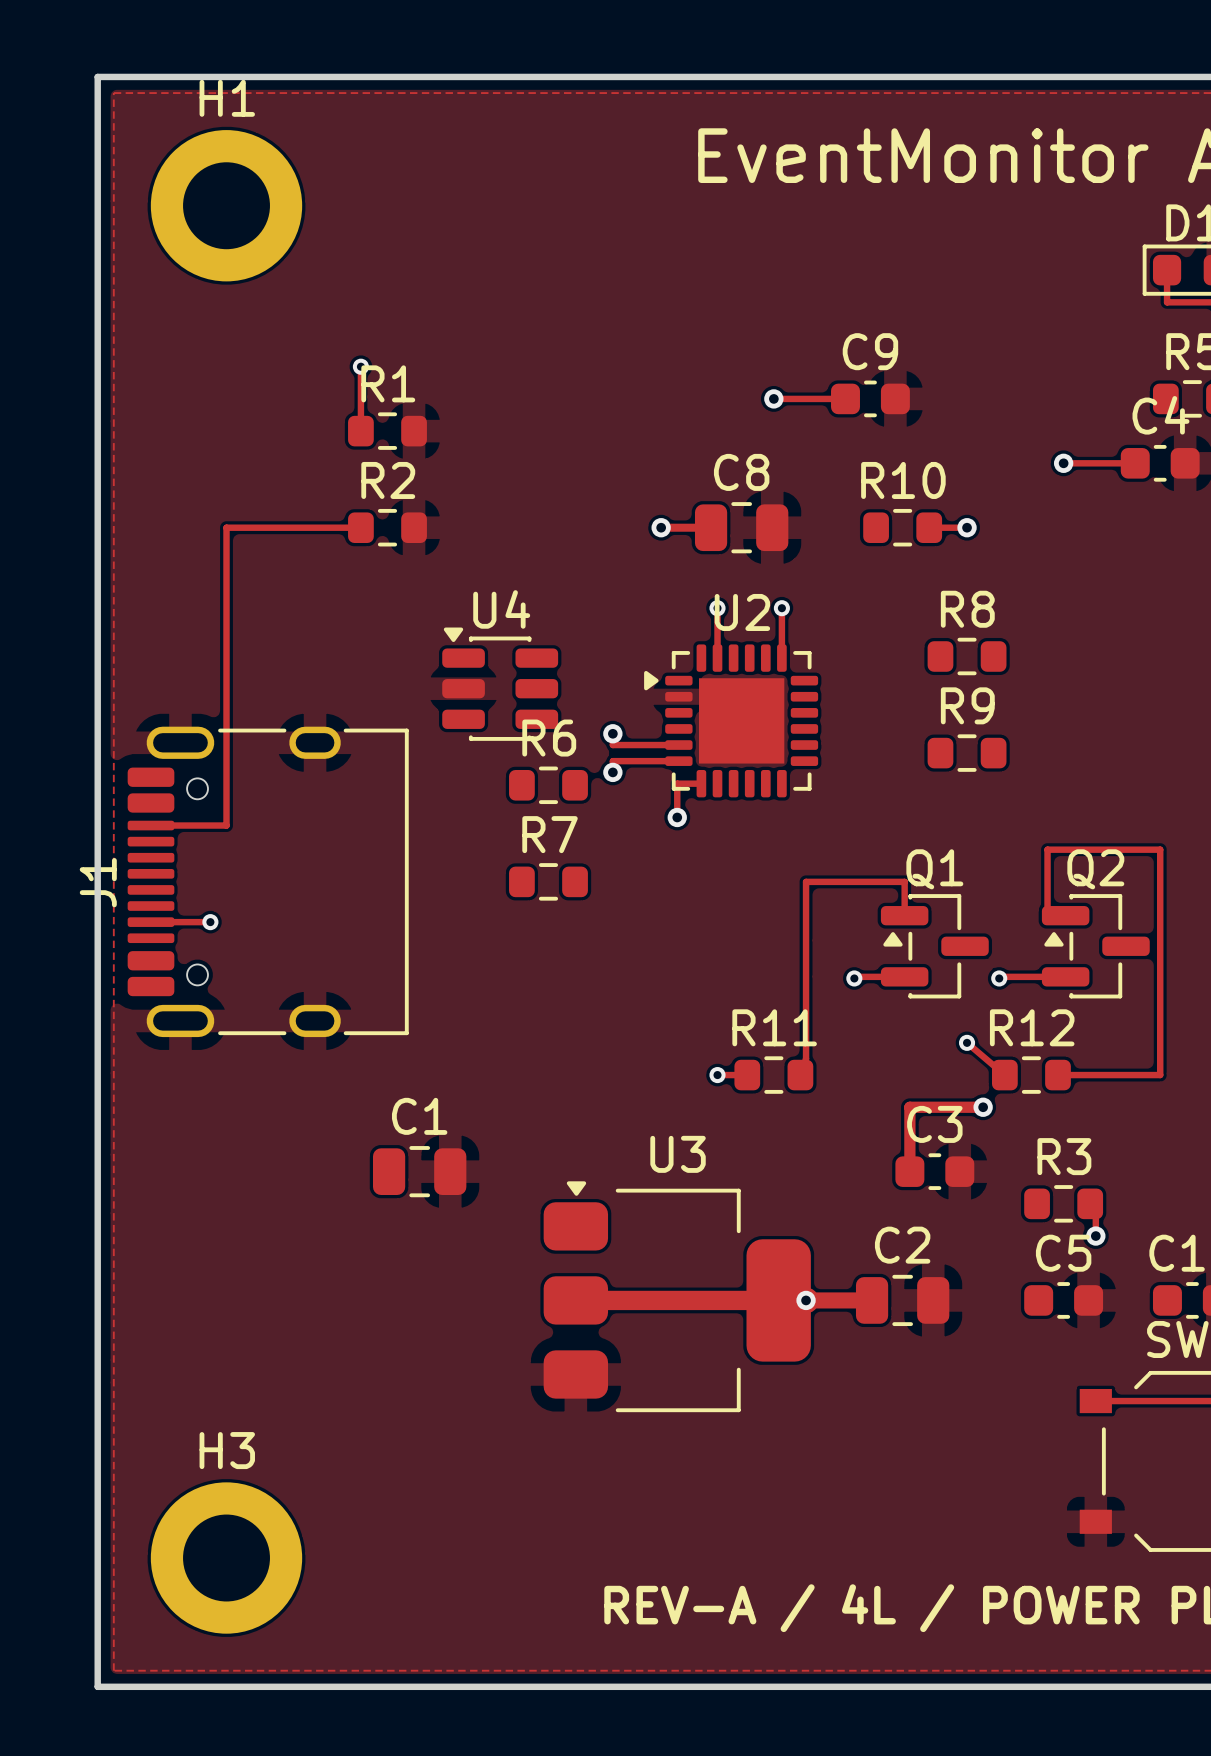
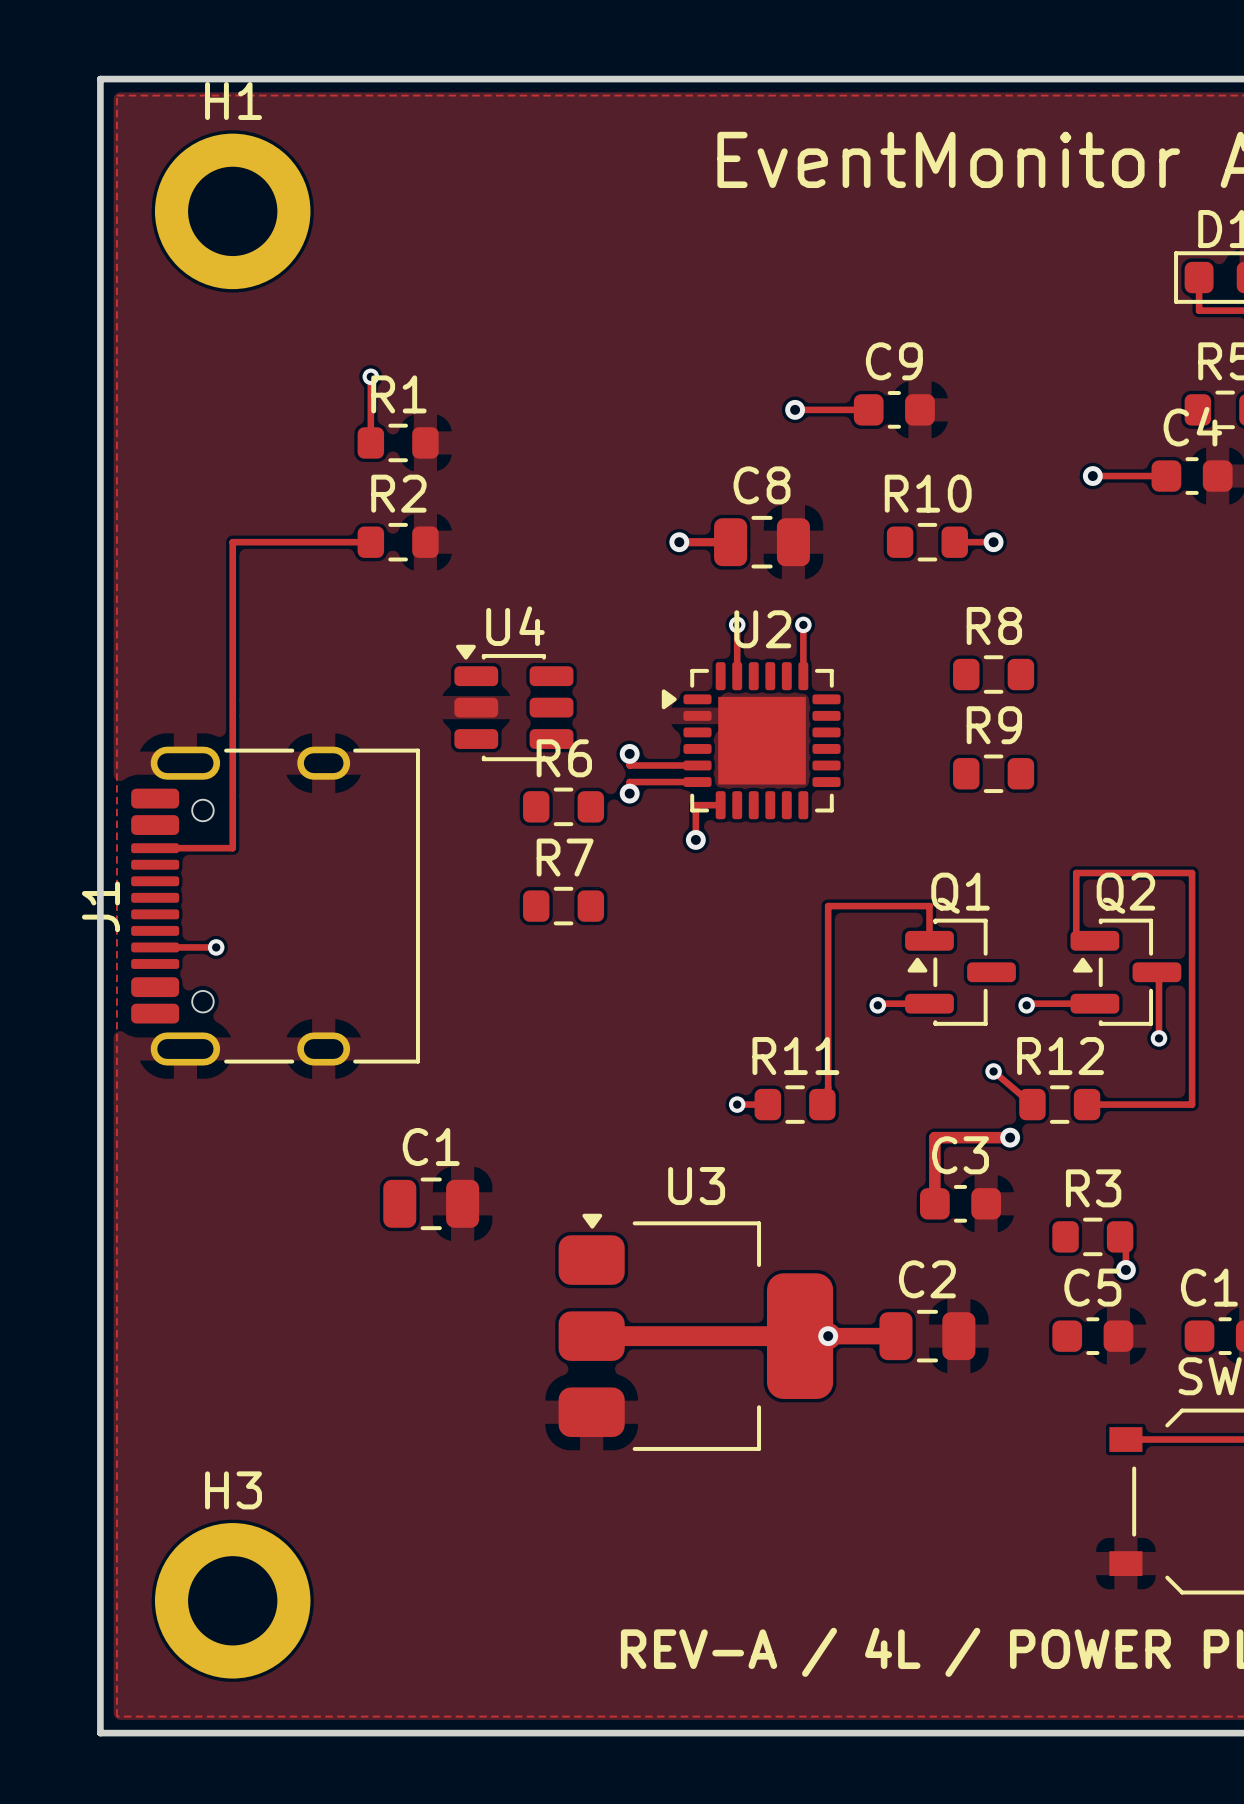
track: none -> (1156, 972) (1158, 972) (1158, 1038)
via: none -> (1158, 1038)

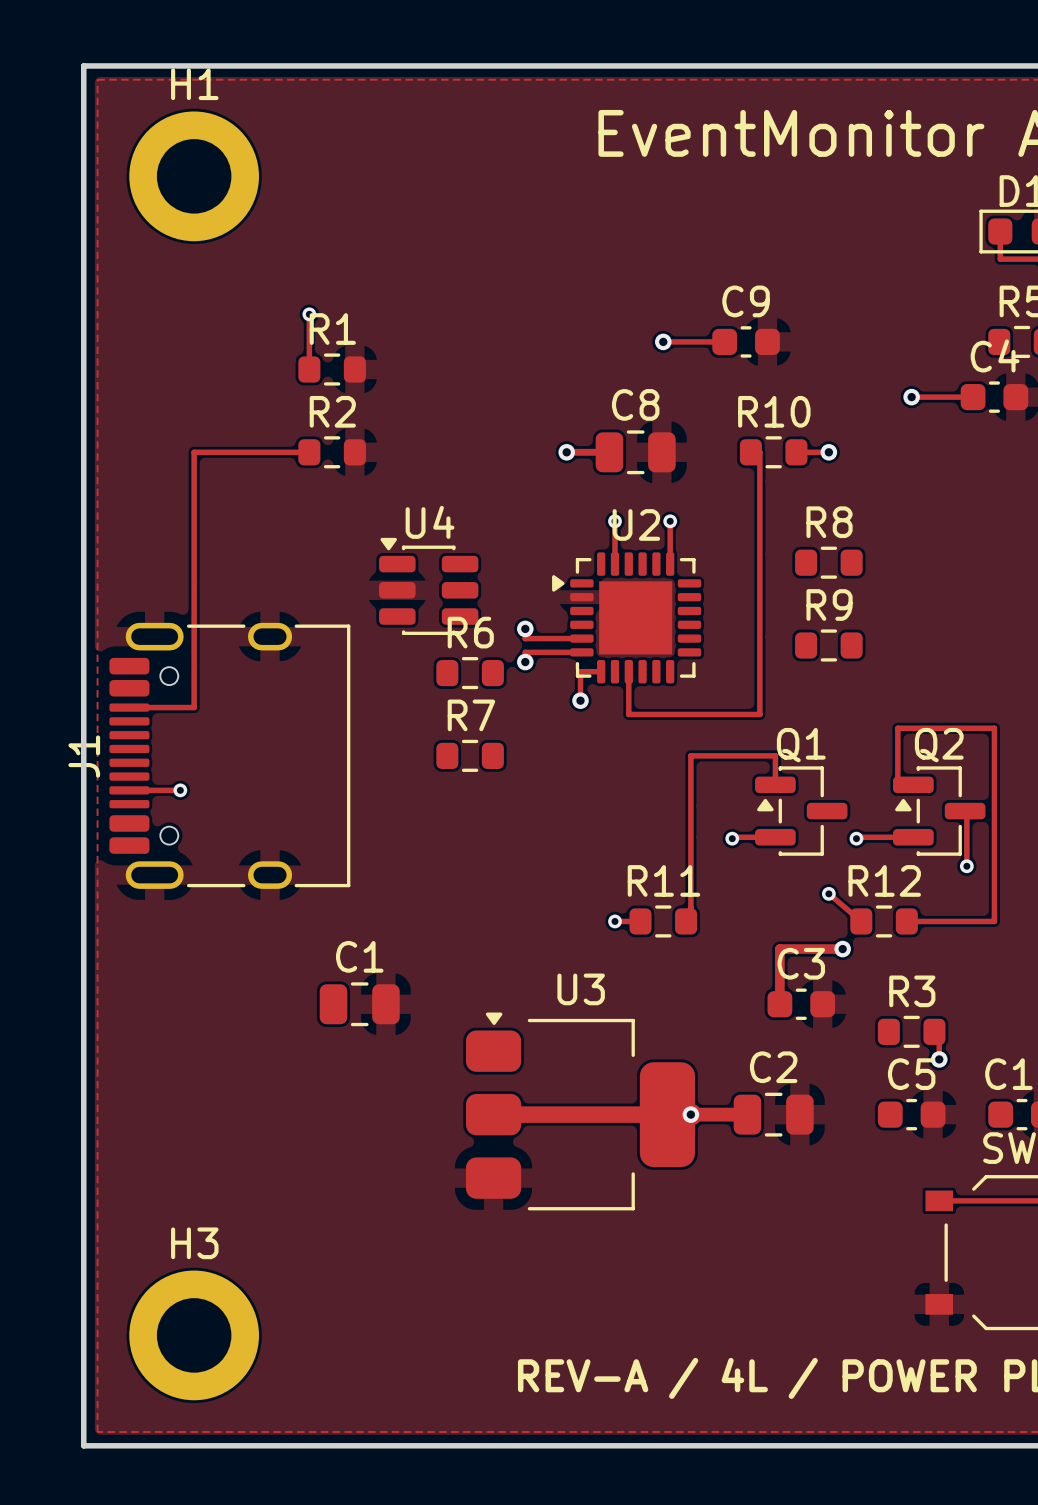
track: none -> (750, 452) (759, 452) (759, 714) (628, 714) (628, 671)

